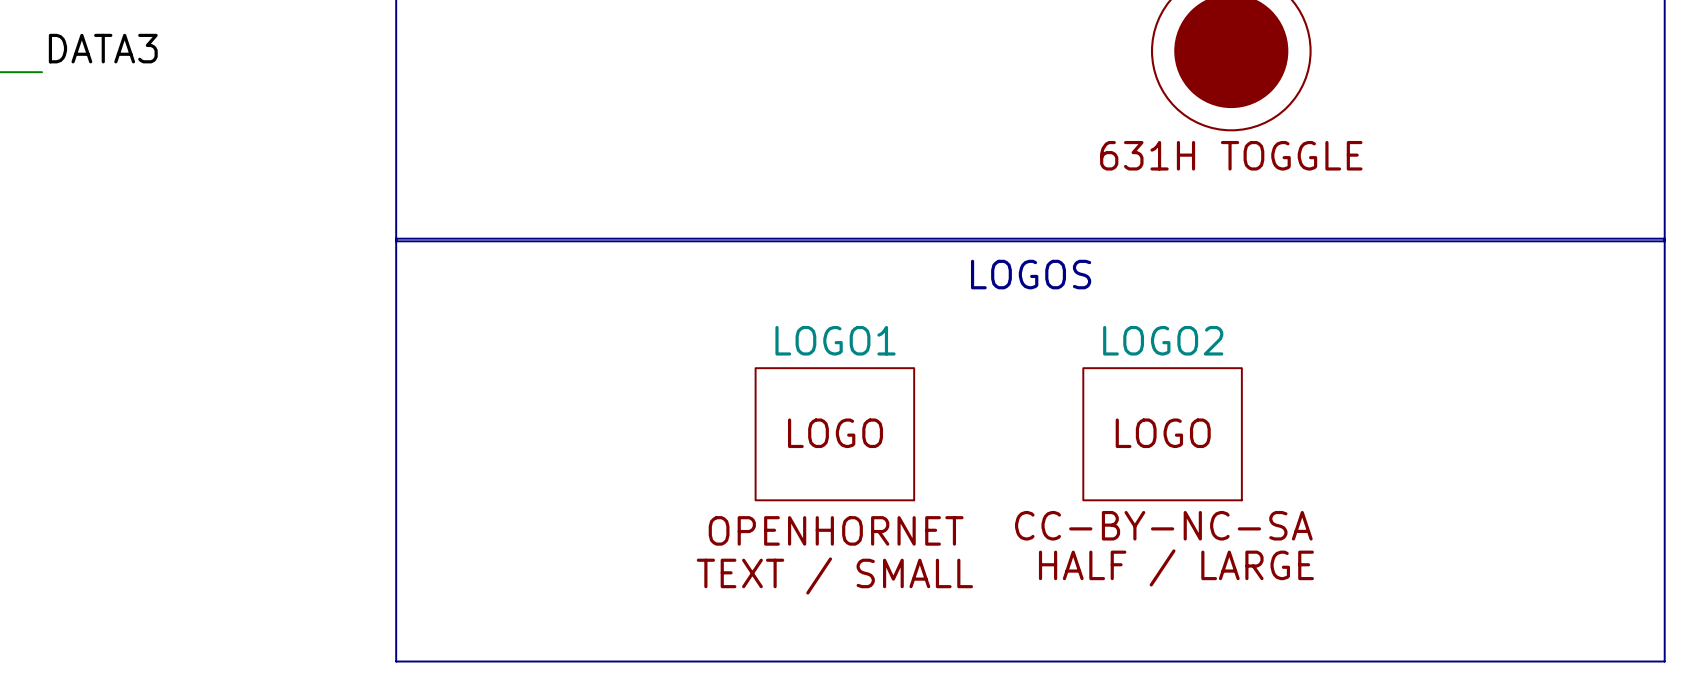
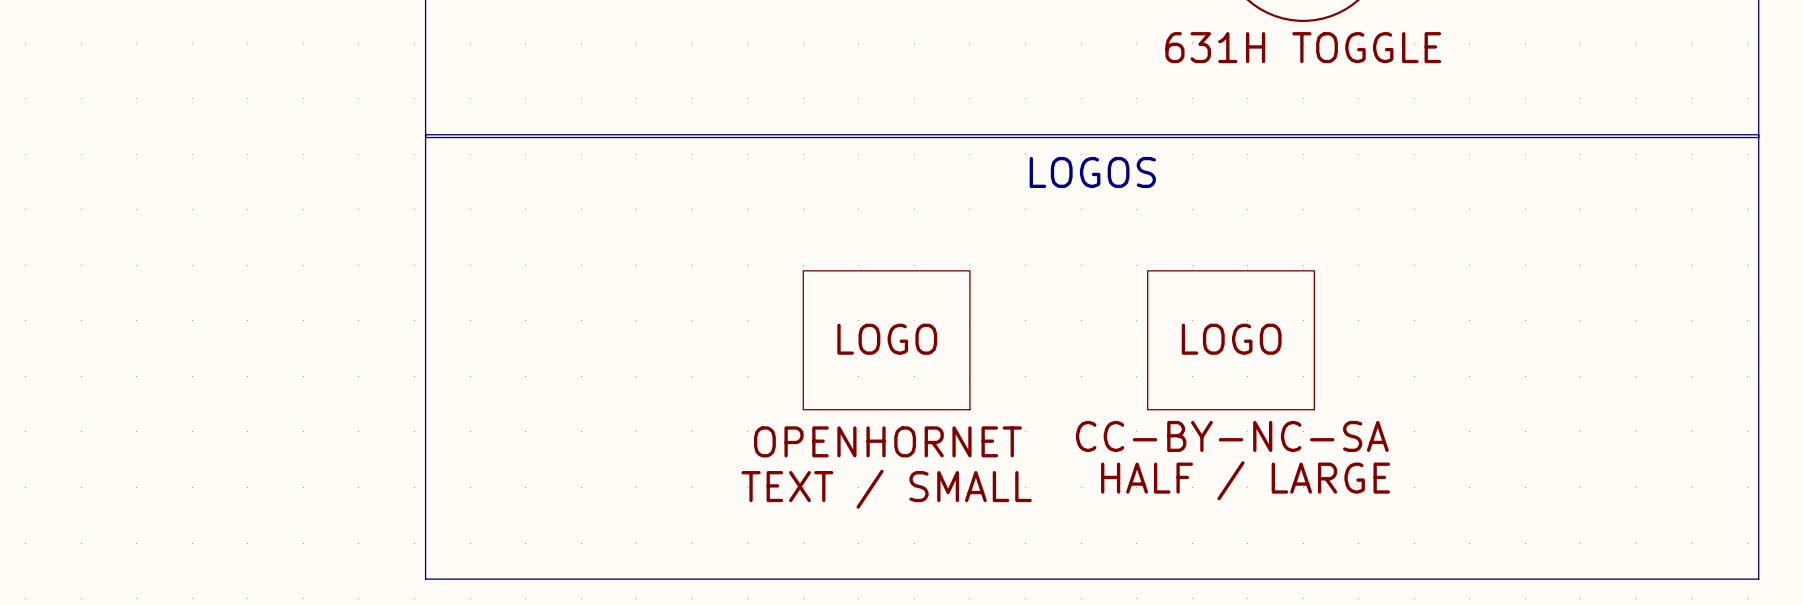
LOGO1 name: LOGO1 (835, 340) -> none
LOGO2 name: LOGO2 (1163, 340) -> none

